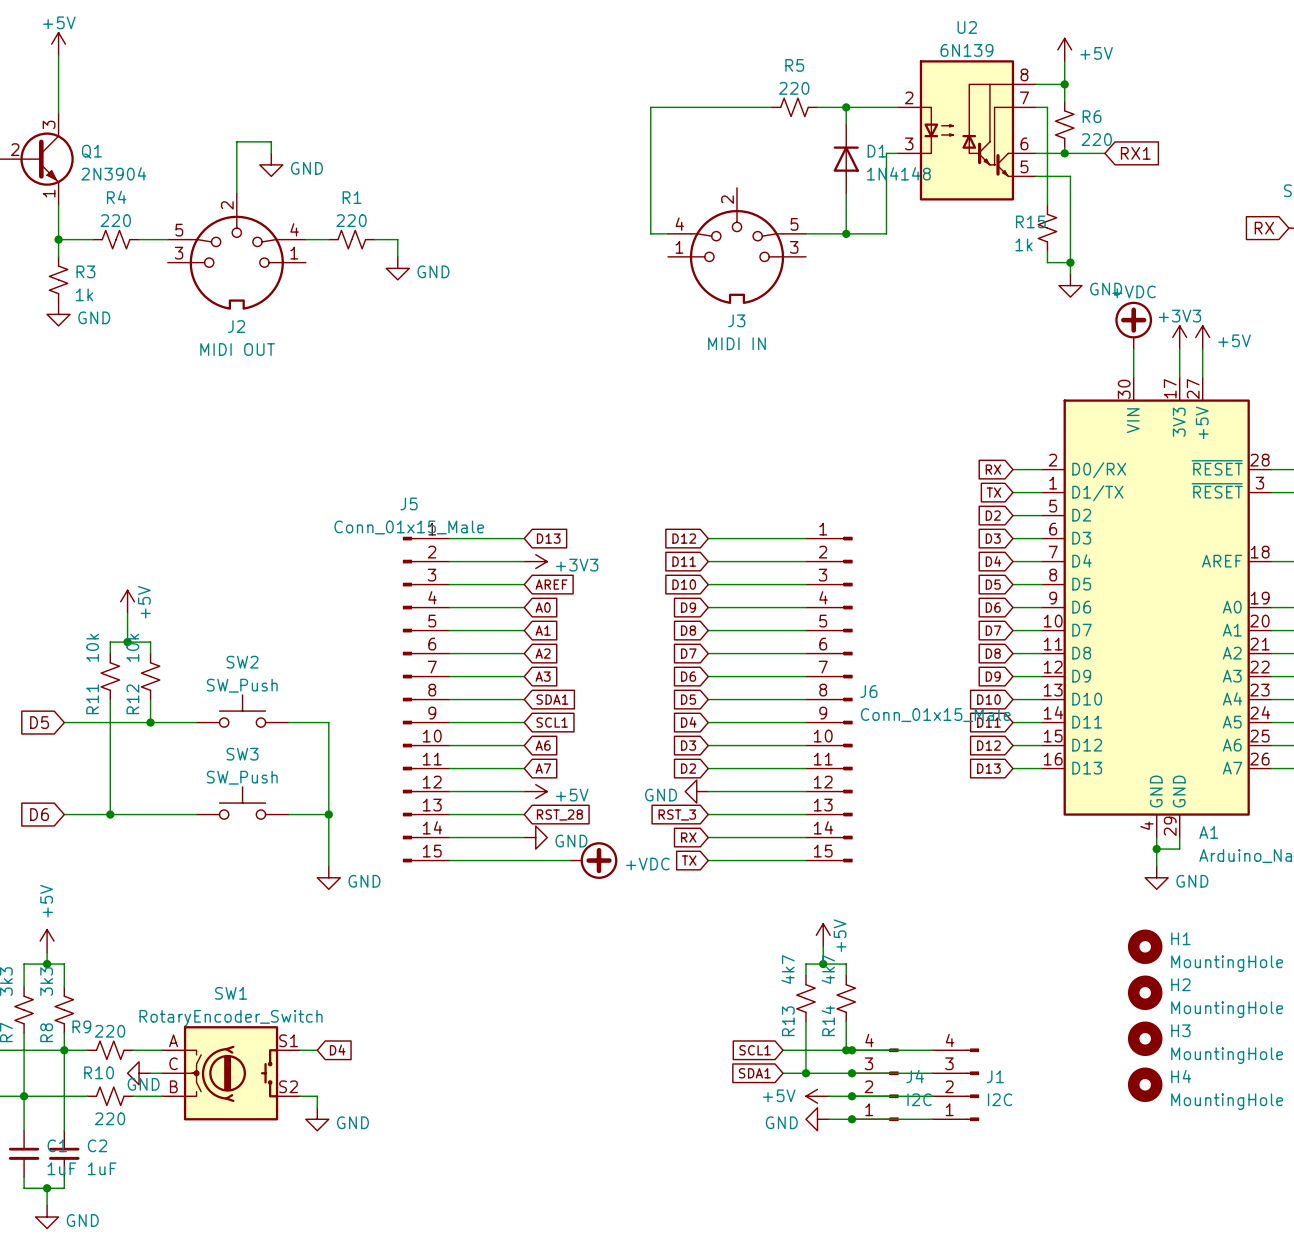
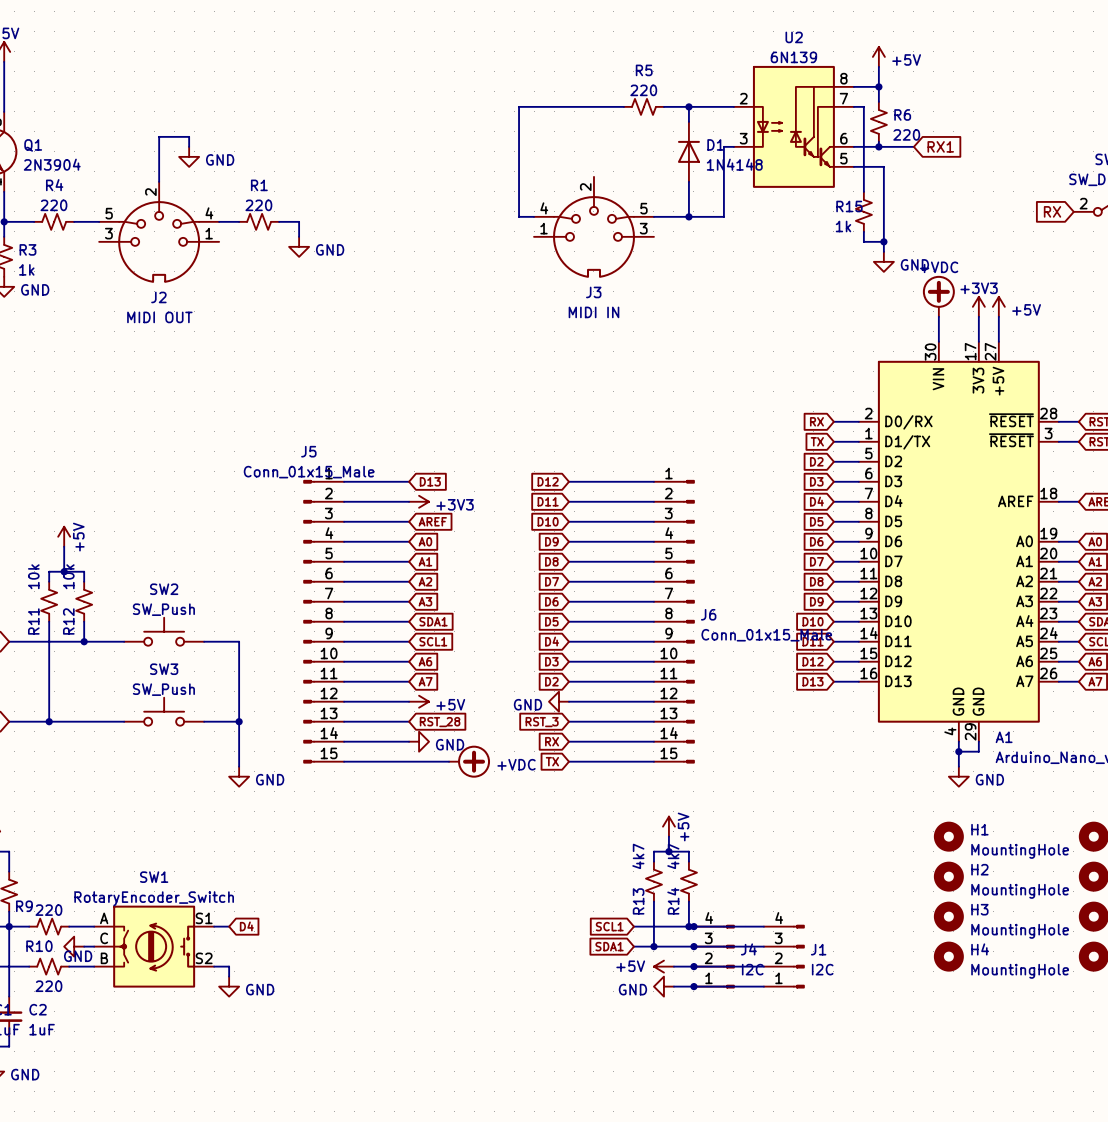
SW1 symbol: [162, 1026, 301, 1121] -> [94, 905, 215, 988]

